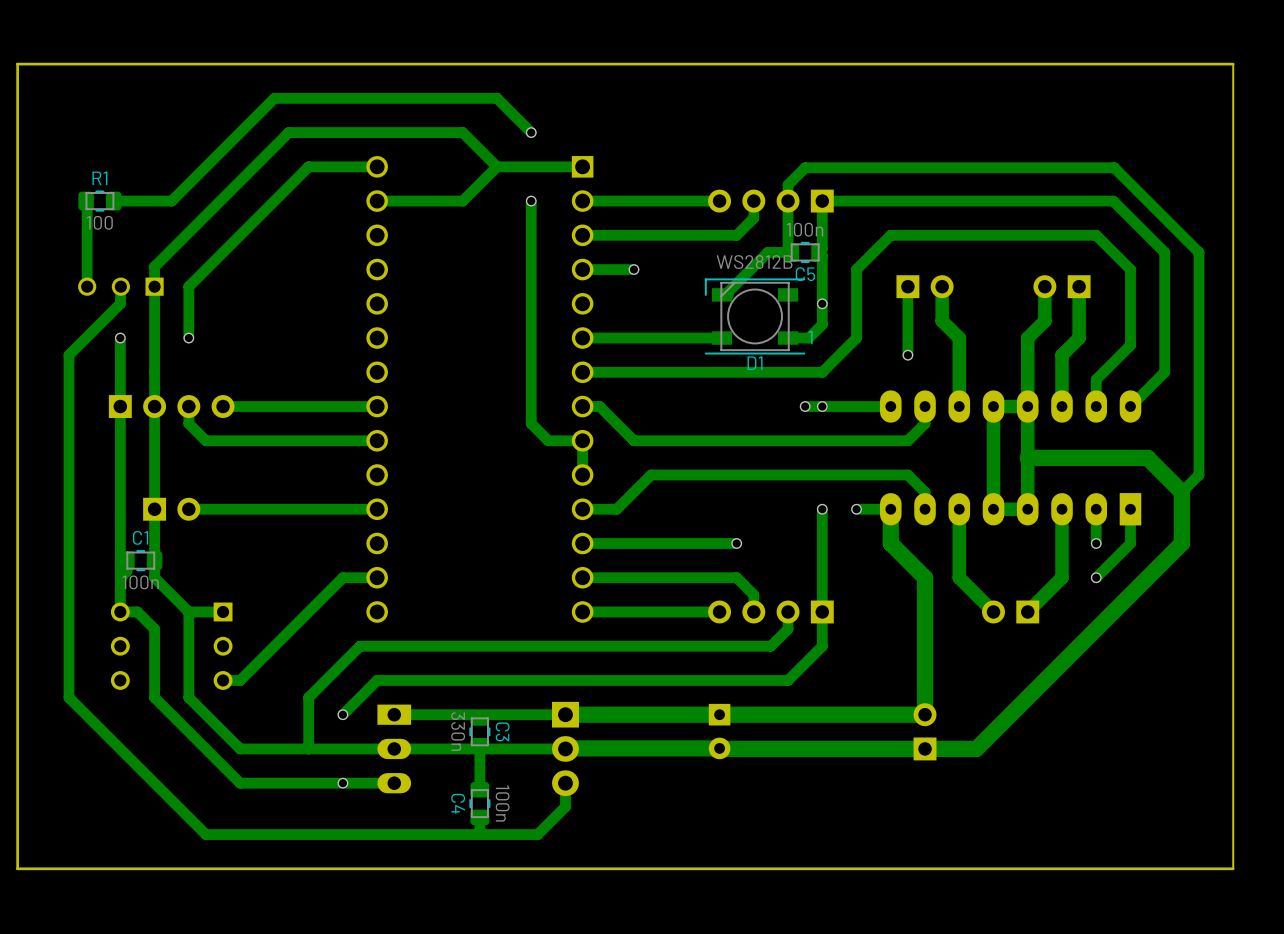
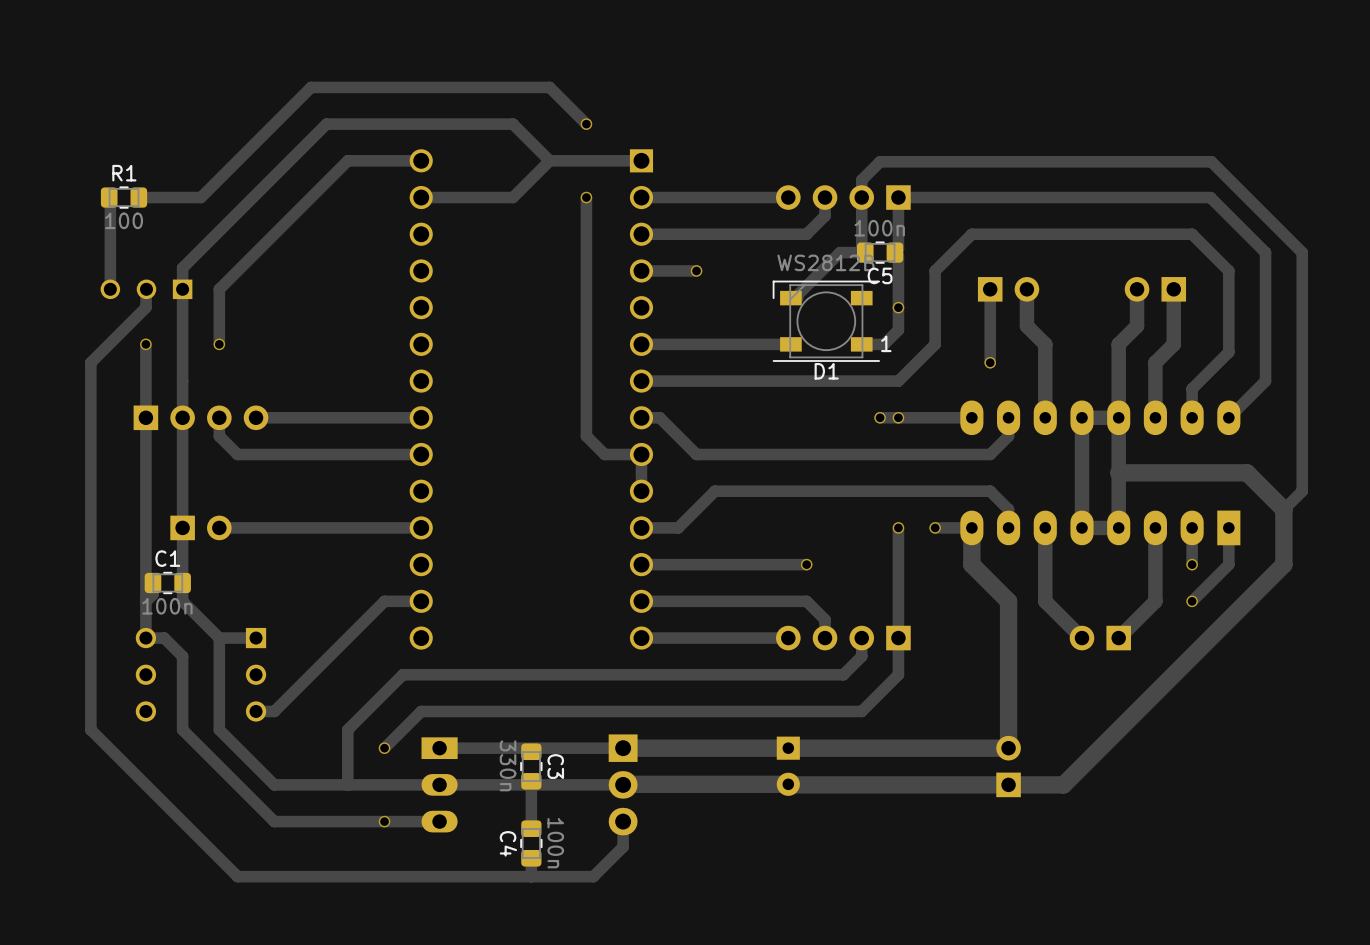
board edge: (1233, 64) (1233, 868) (17, 868) (17, 64) (1233, 64) -> none

